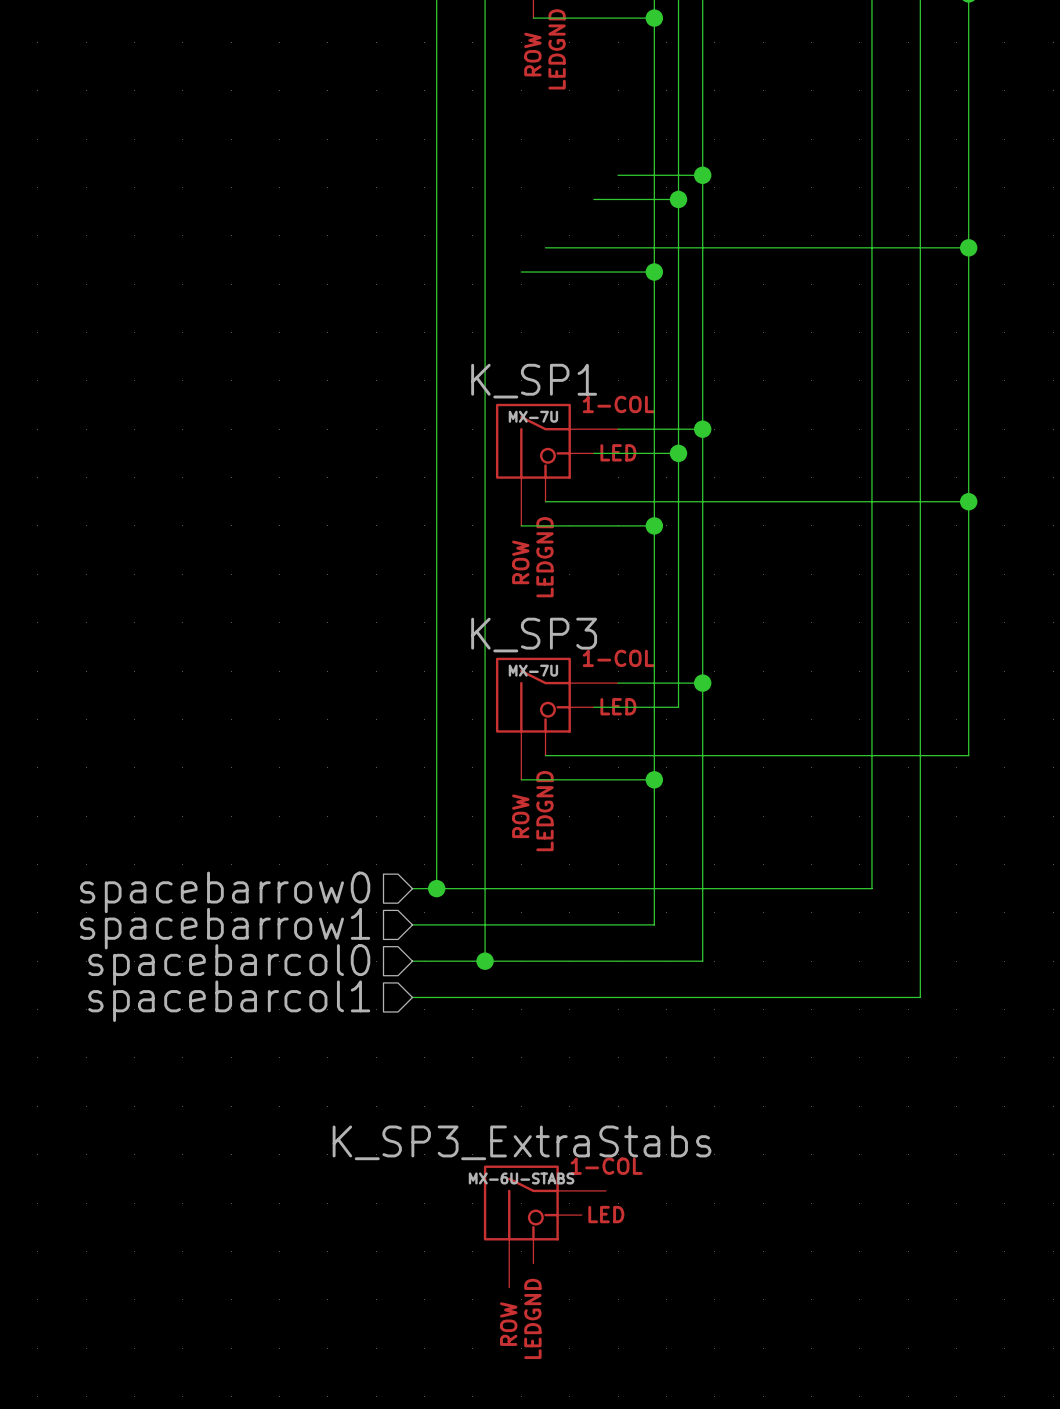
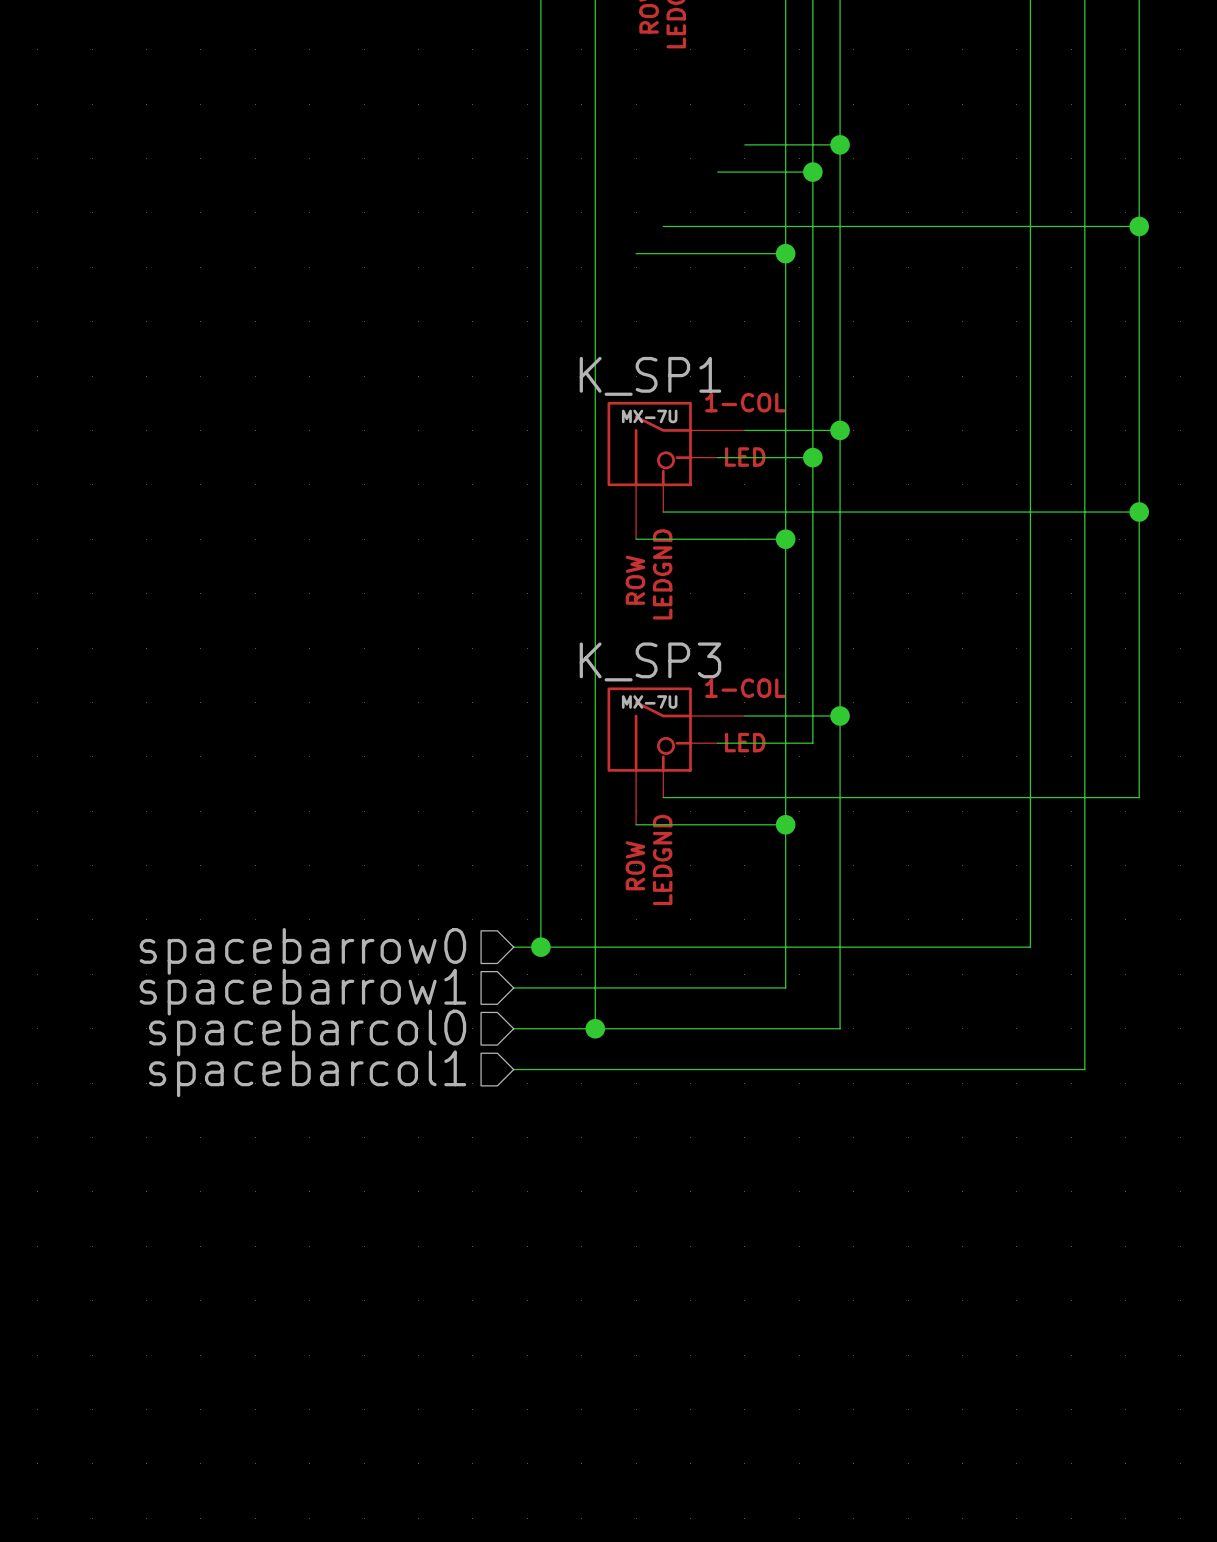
K_SP3_ExtraStabs: MX-6U-STABS (544, 1226) -> none

